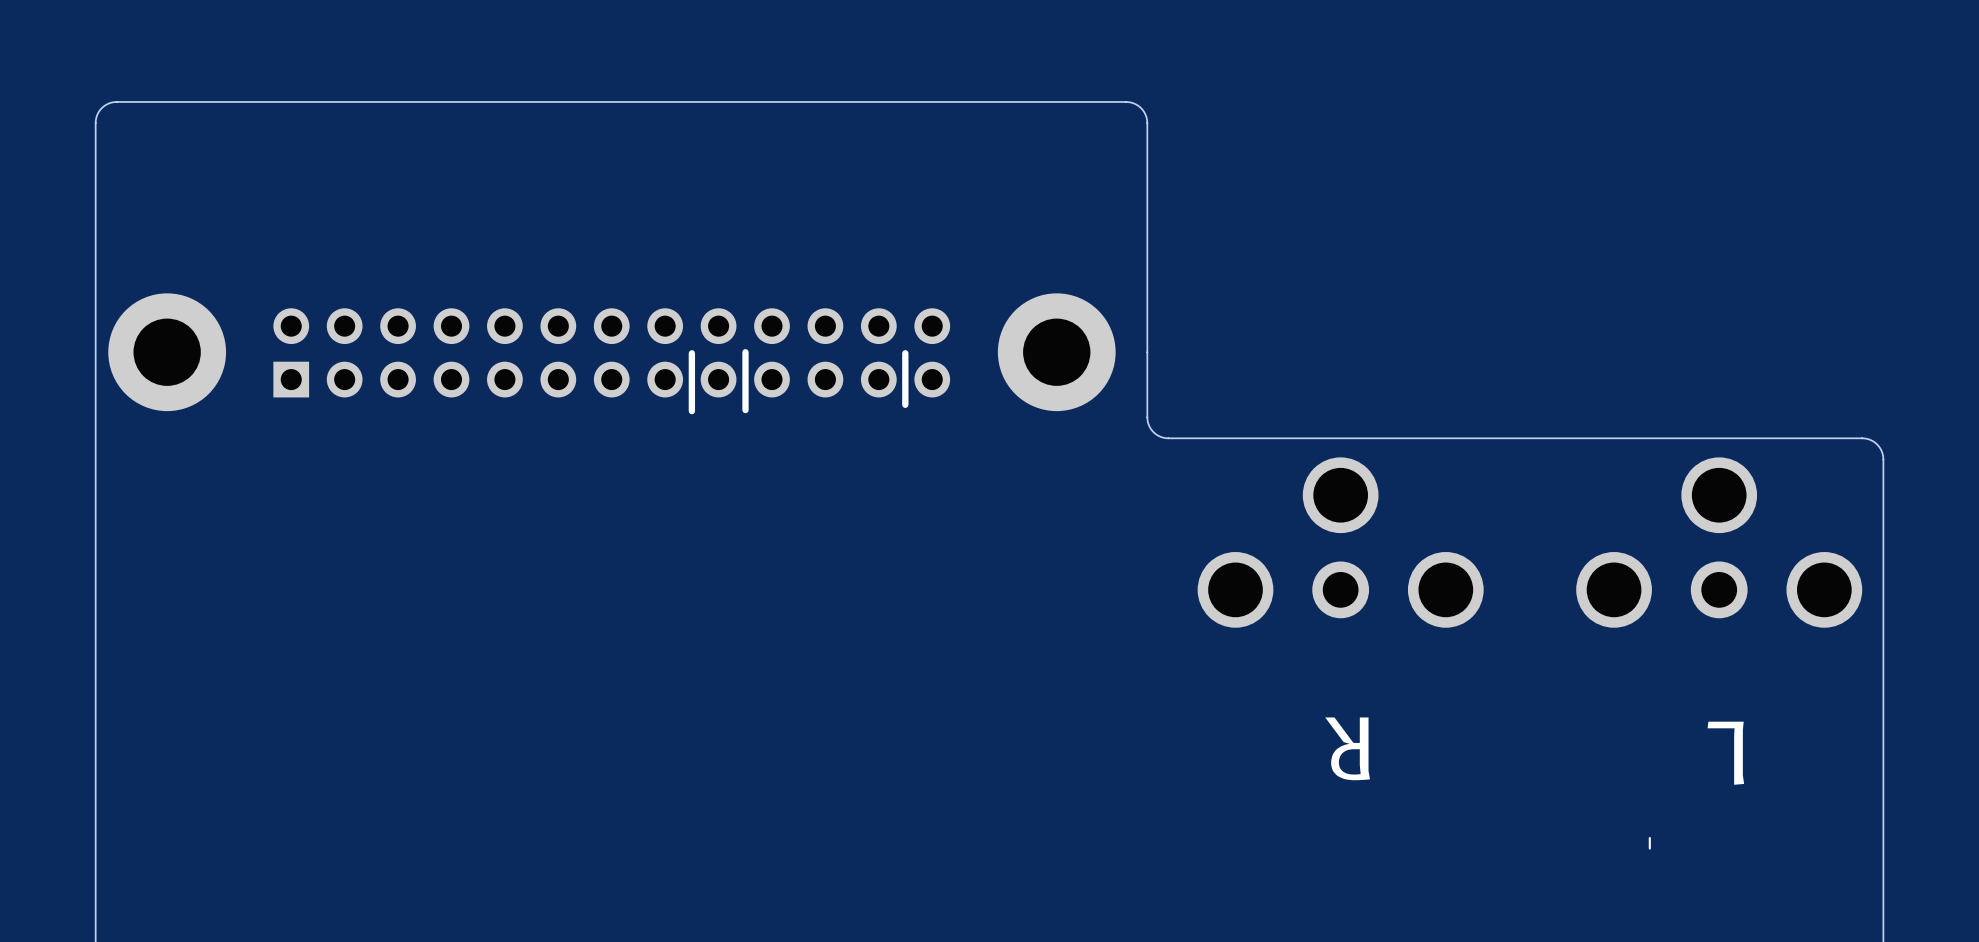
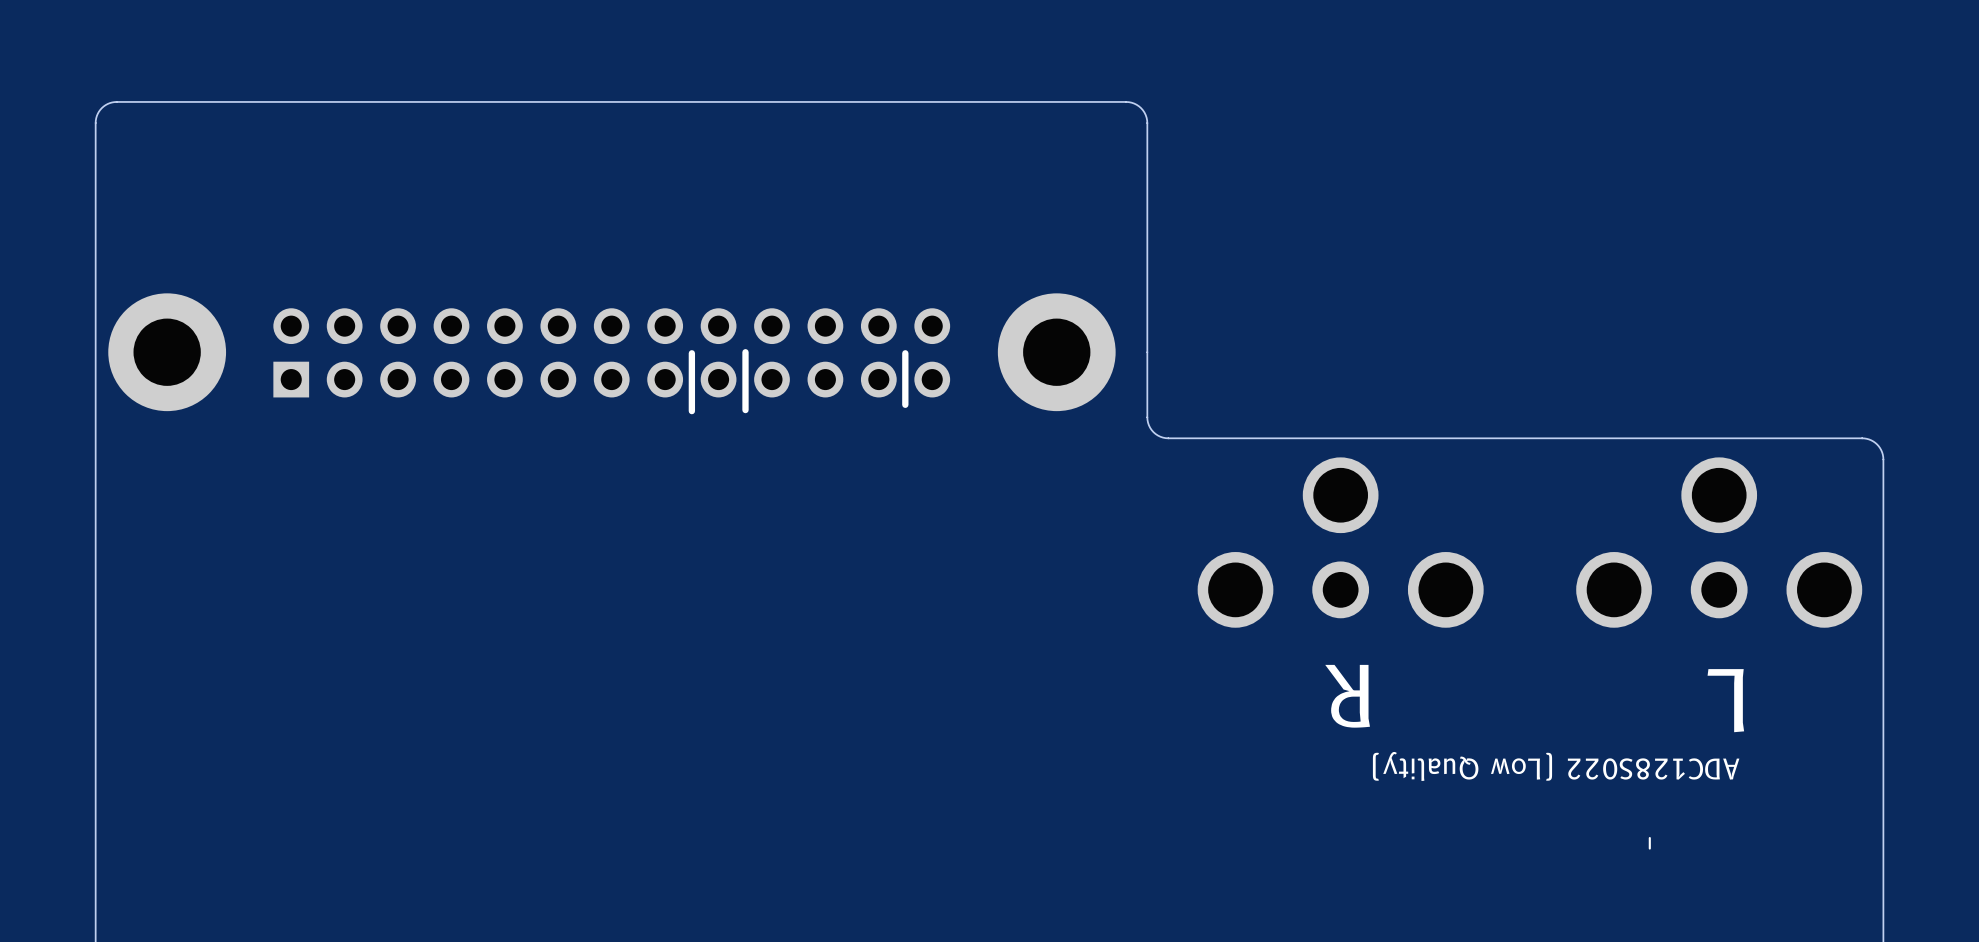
text position: R (1347, 748) -> R (1347, 696)
text position: L (1725, 753) -> L (1725, 700)
text: none -> ADC128S022 (Low Quality) (1556, 766)

